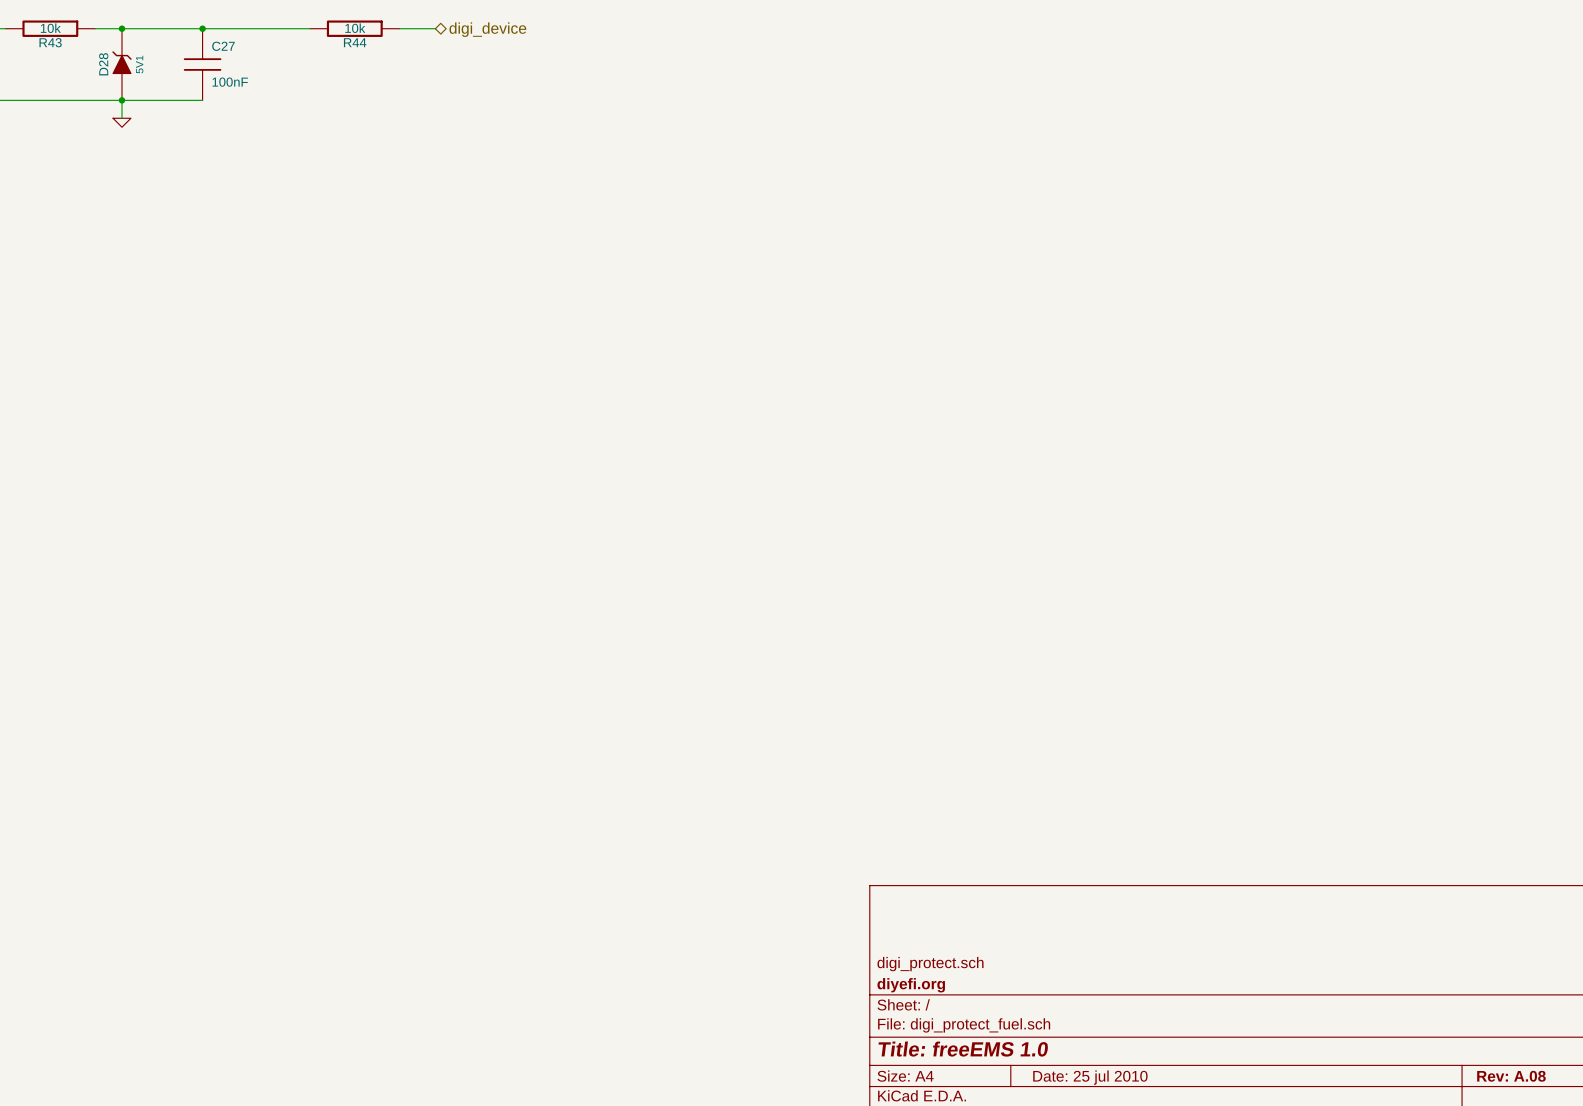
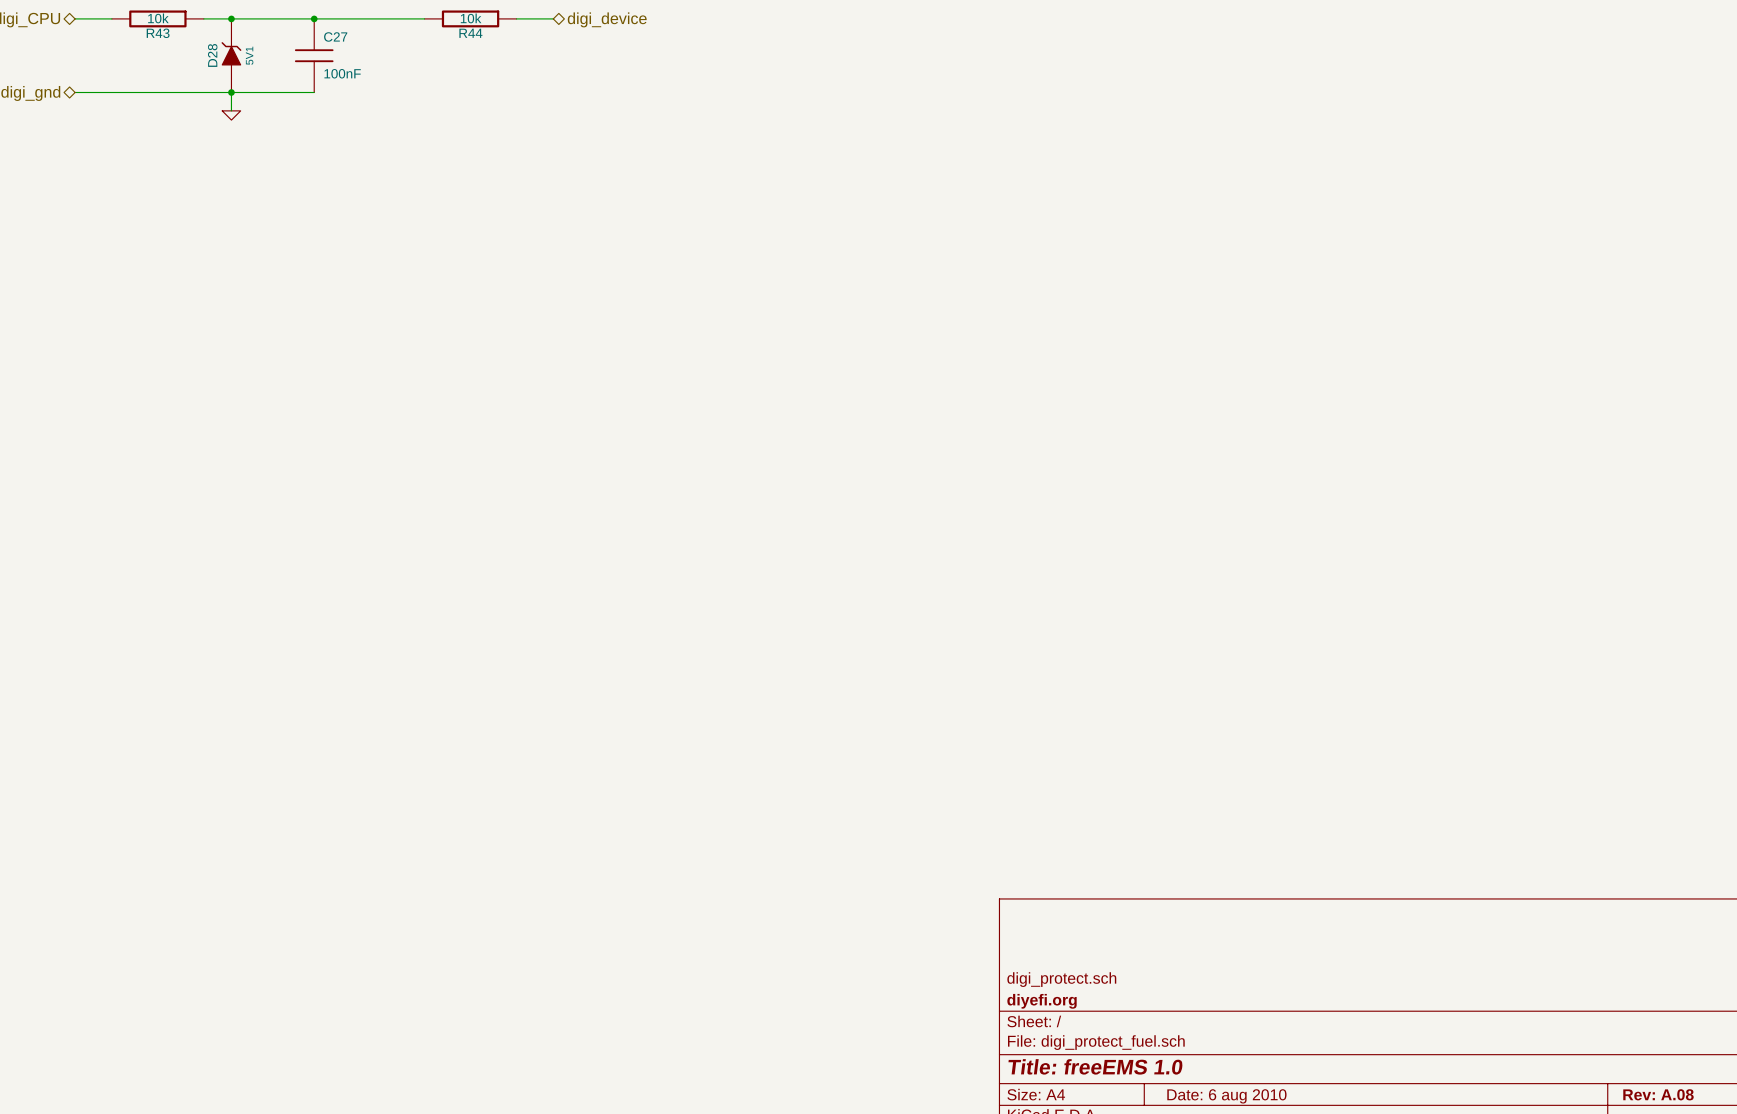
title block: Date: 25 jul 2010 (1090, 1077) -> Date: 6 aug 2010 (1226, 1096)

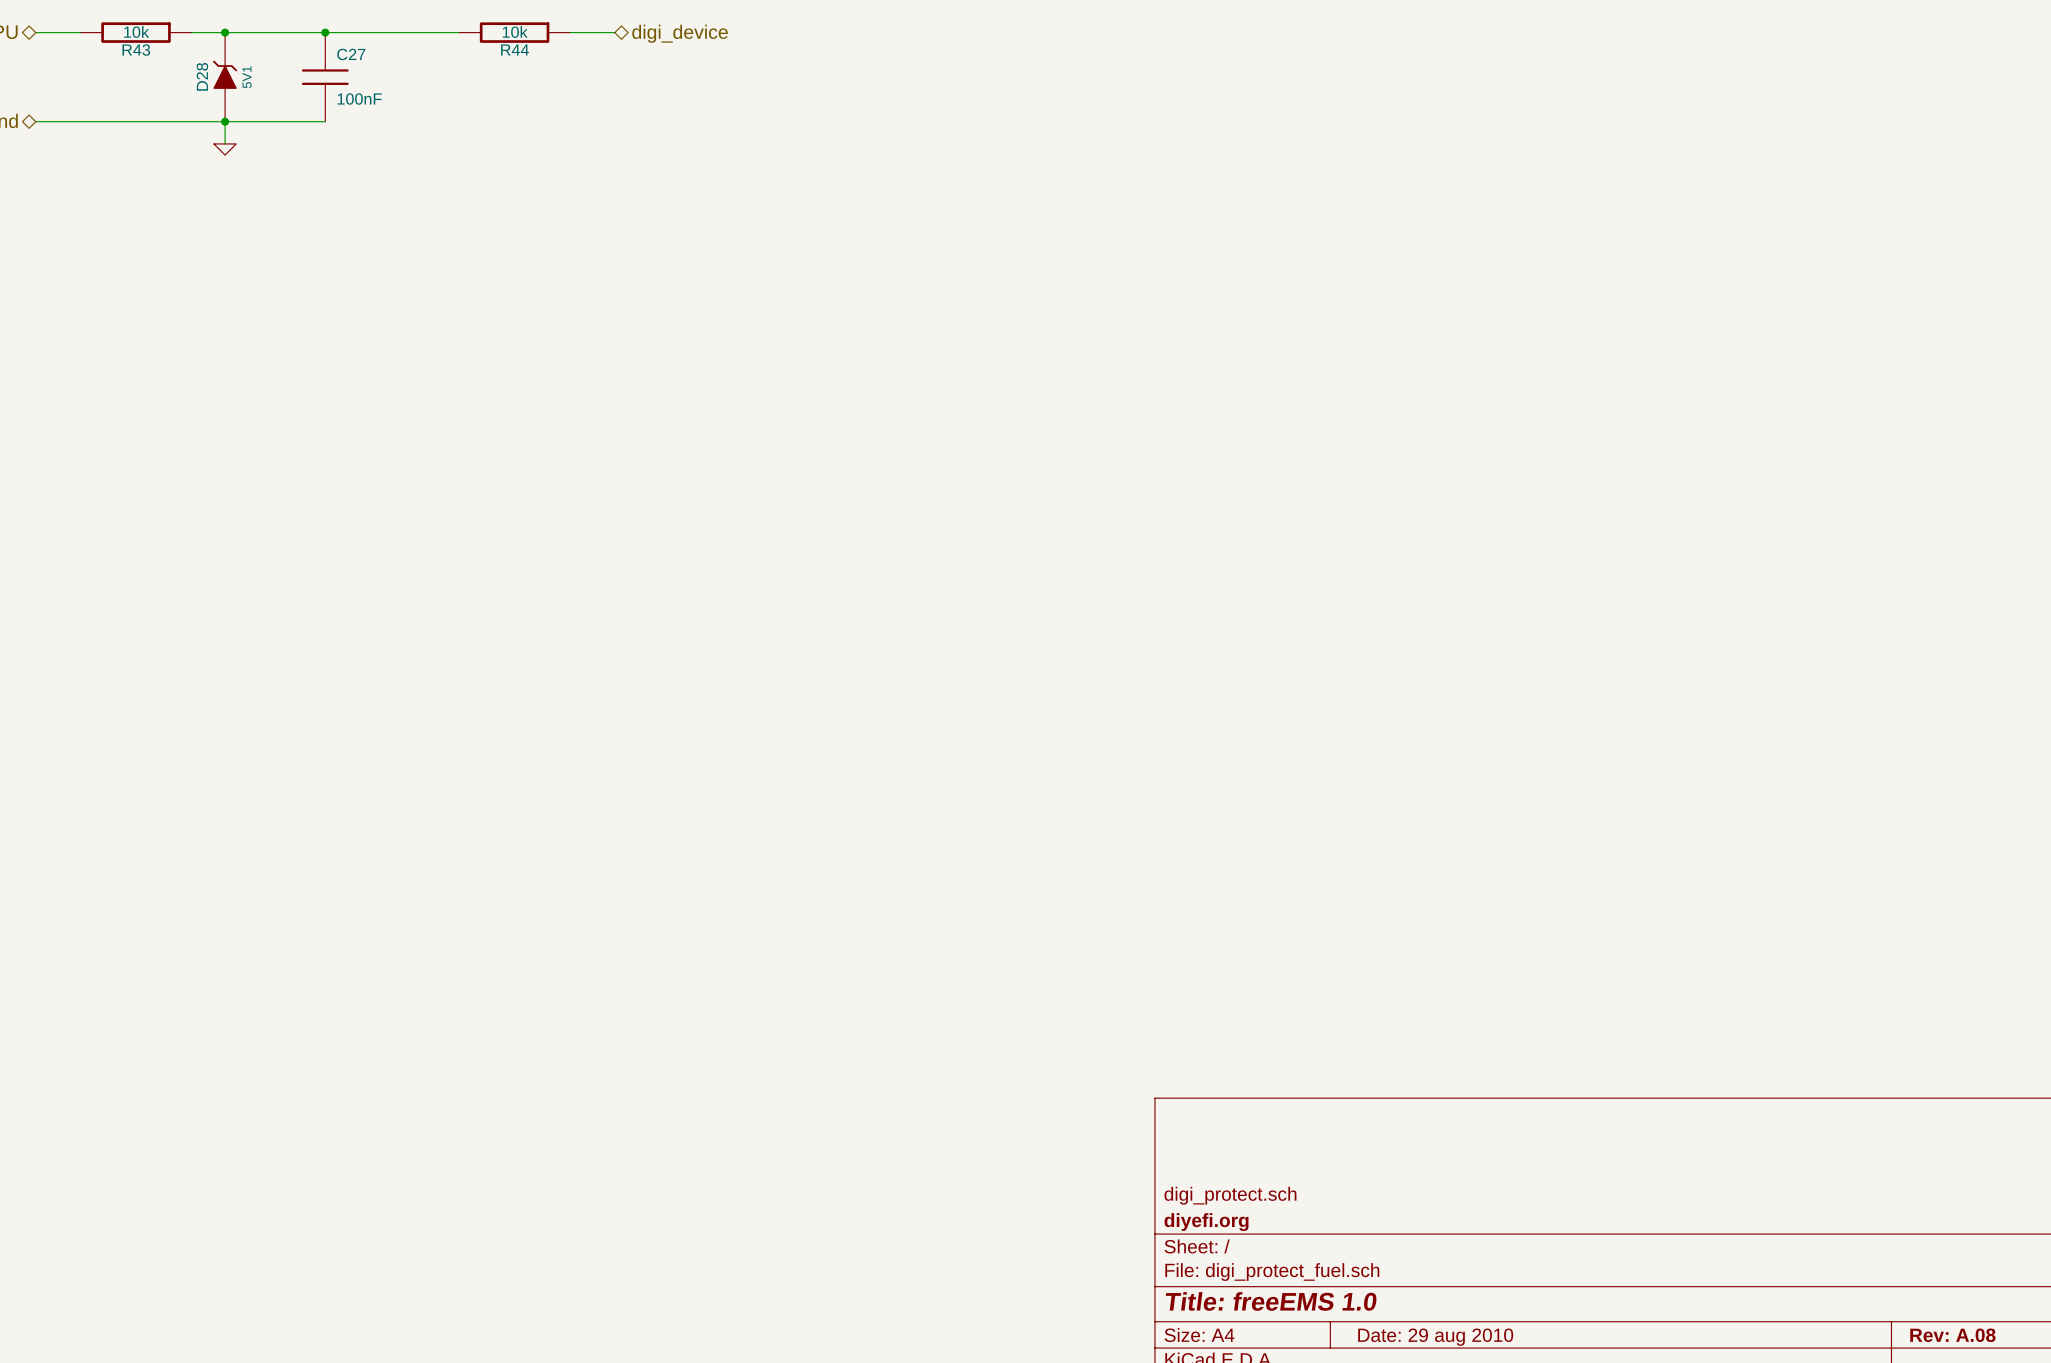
title block: Date: 6 aug 2010 (1226, 1096) -> Date: 29 aug 2010 (1435, 1337)

